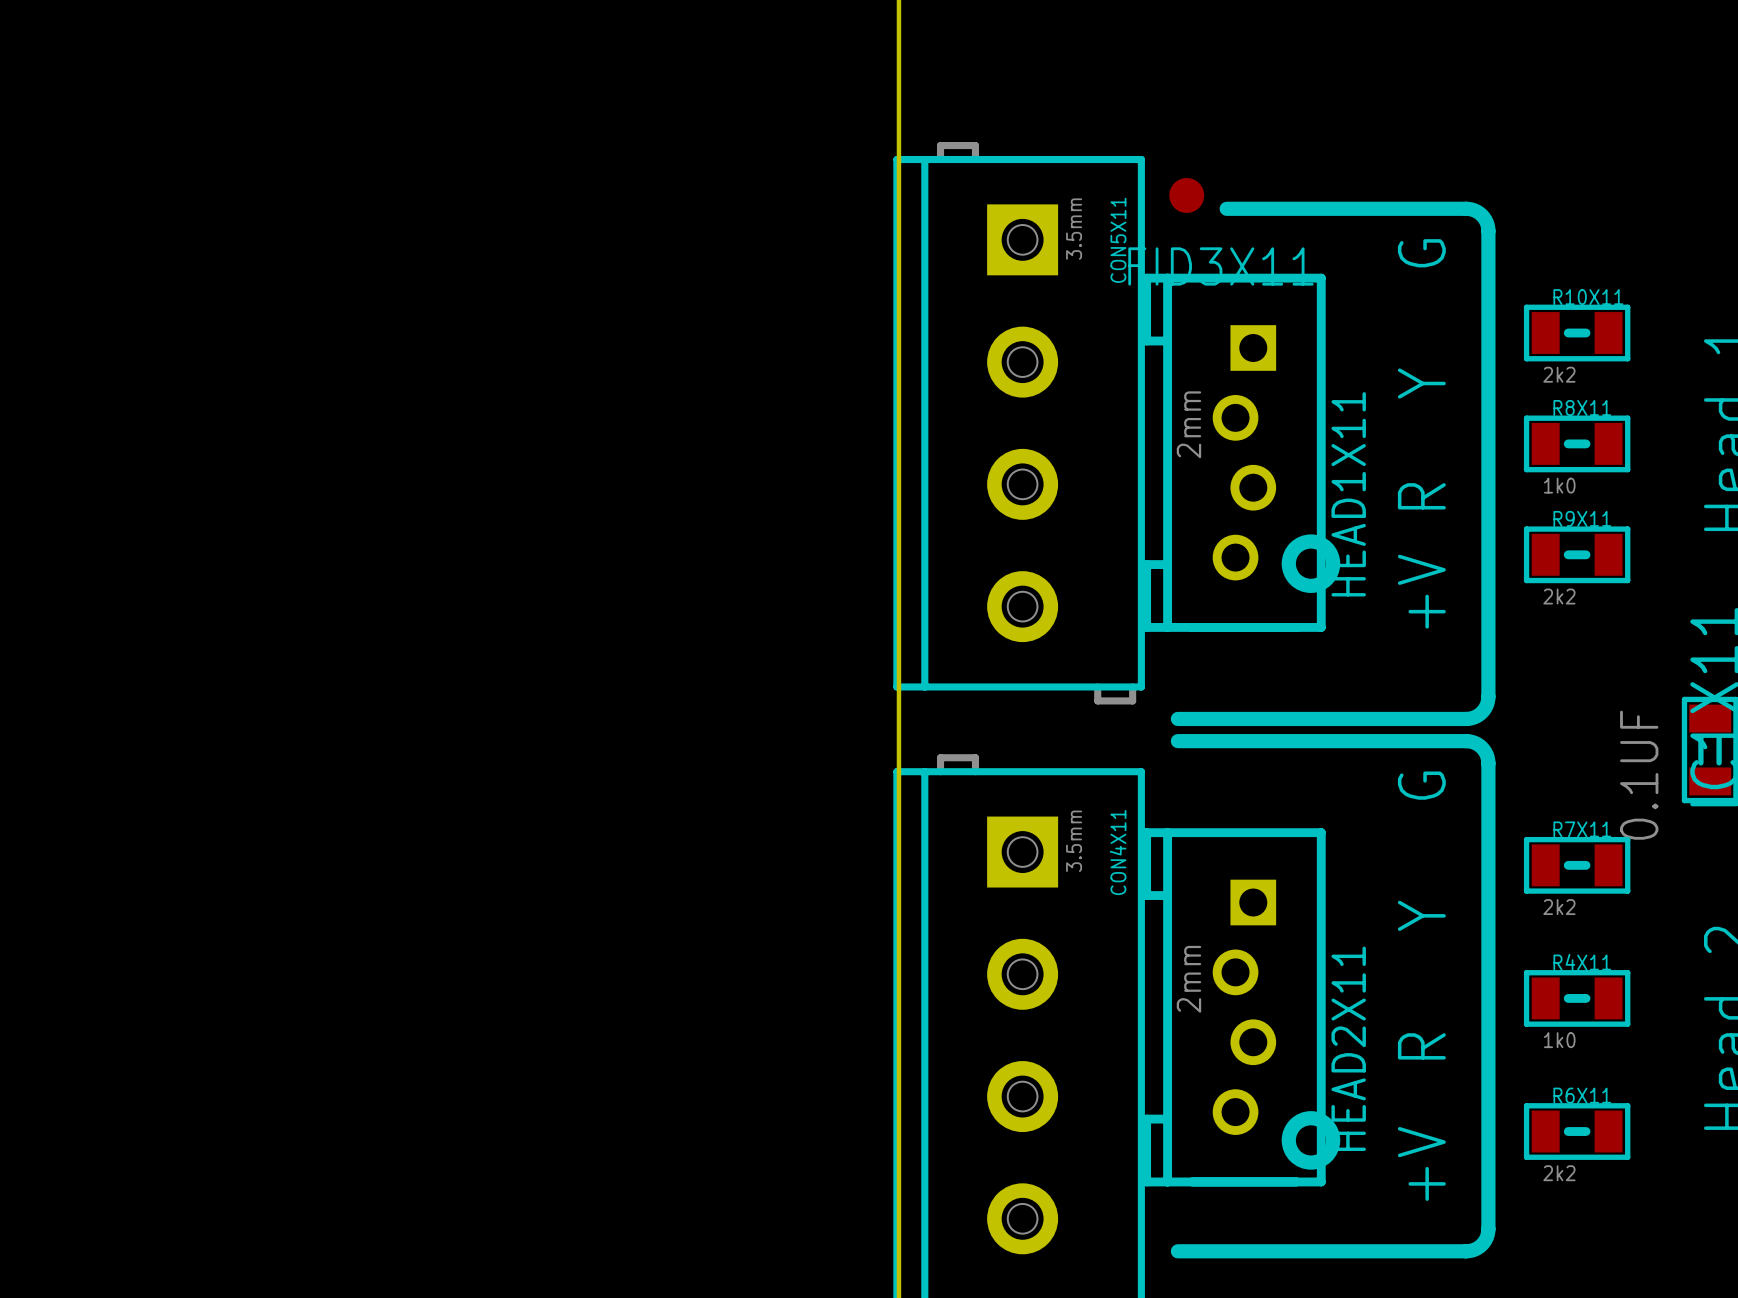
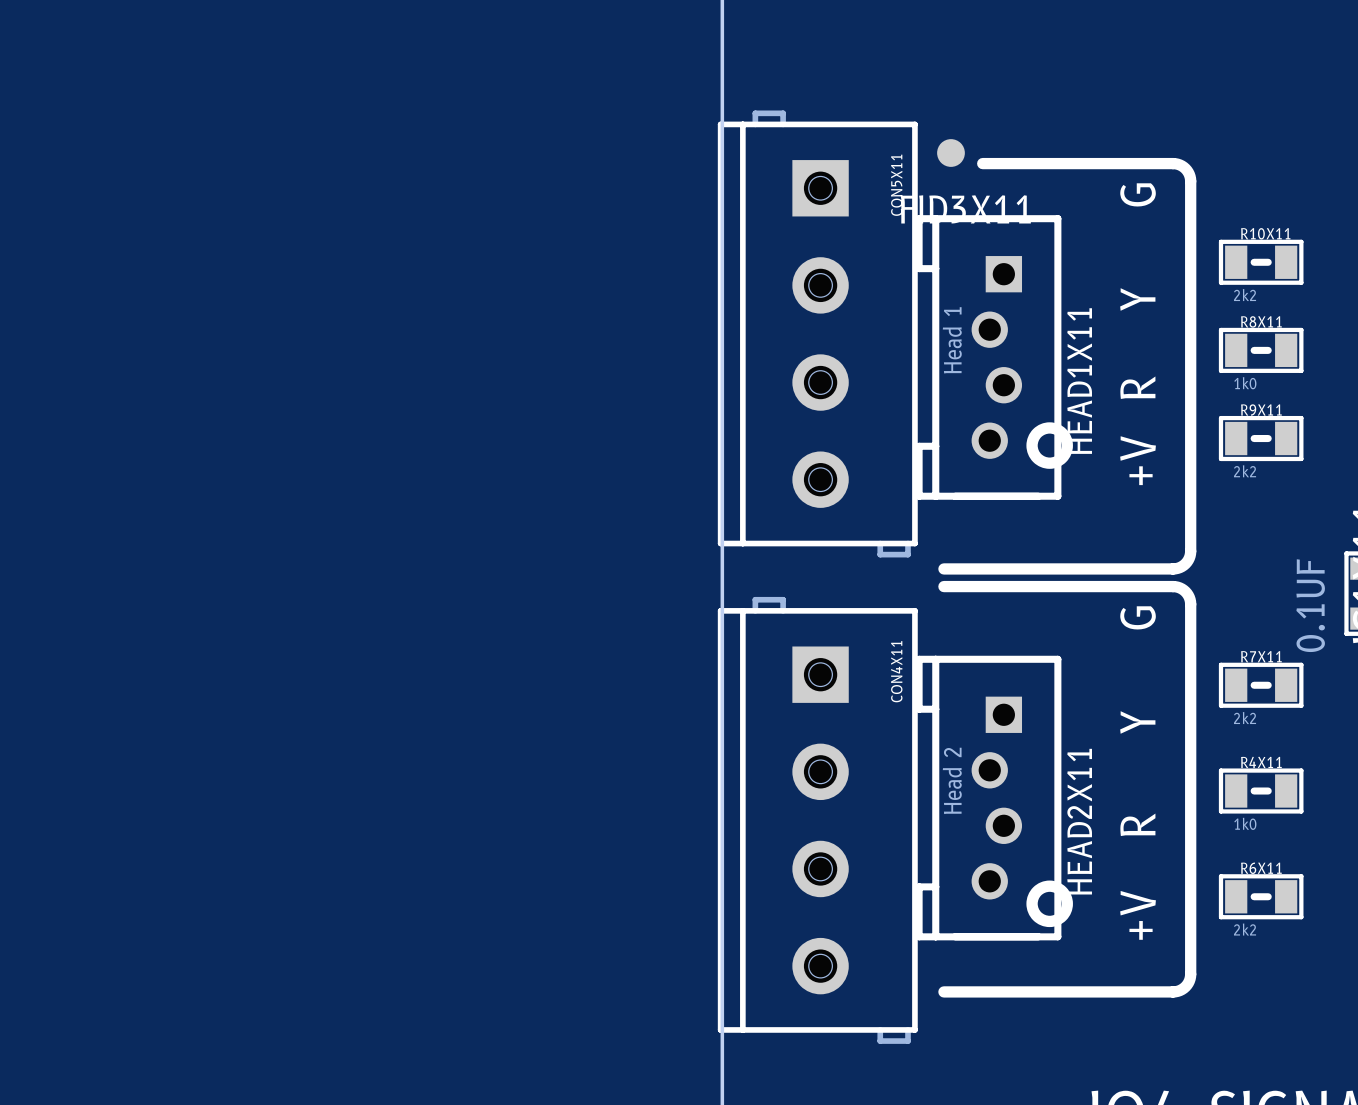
CON5X11 value: 3.5mm (1074, 229) -> none
HEAD1X11 value: 2mm (1188, 424) -> Head 1 (952, 340)
CON4X11 value: 3.5mm (1074, 841) -> none
HEAD2X11 value: 2mm (1188, 979) -> Head 2 (952, 780)

